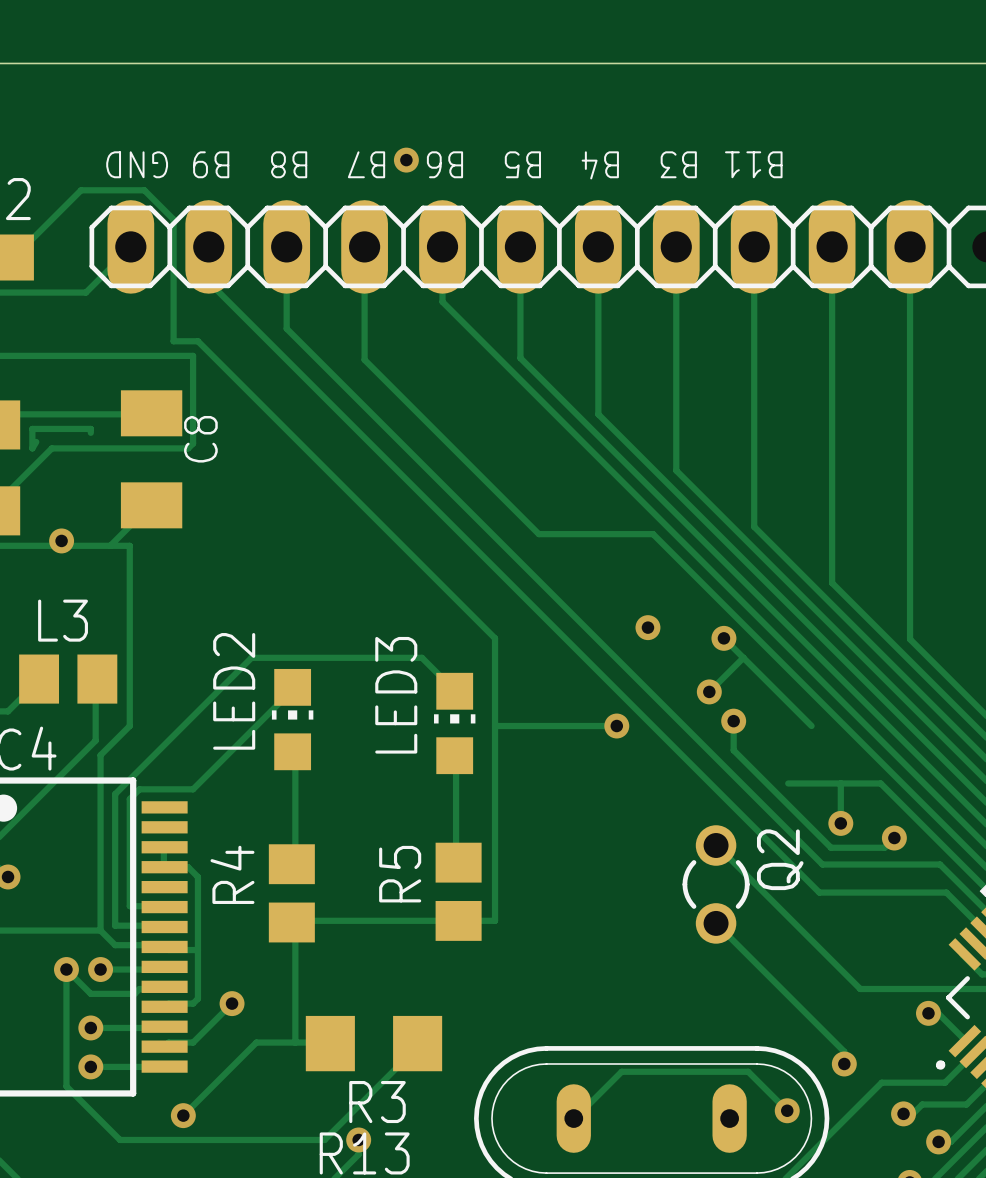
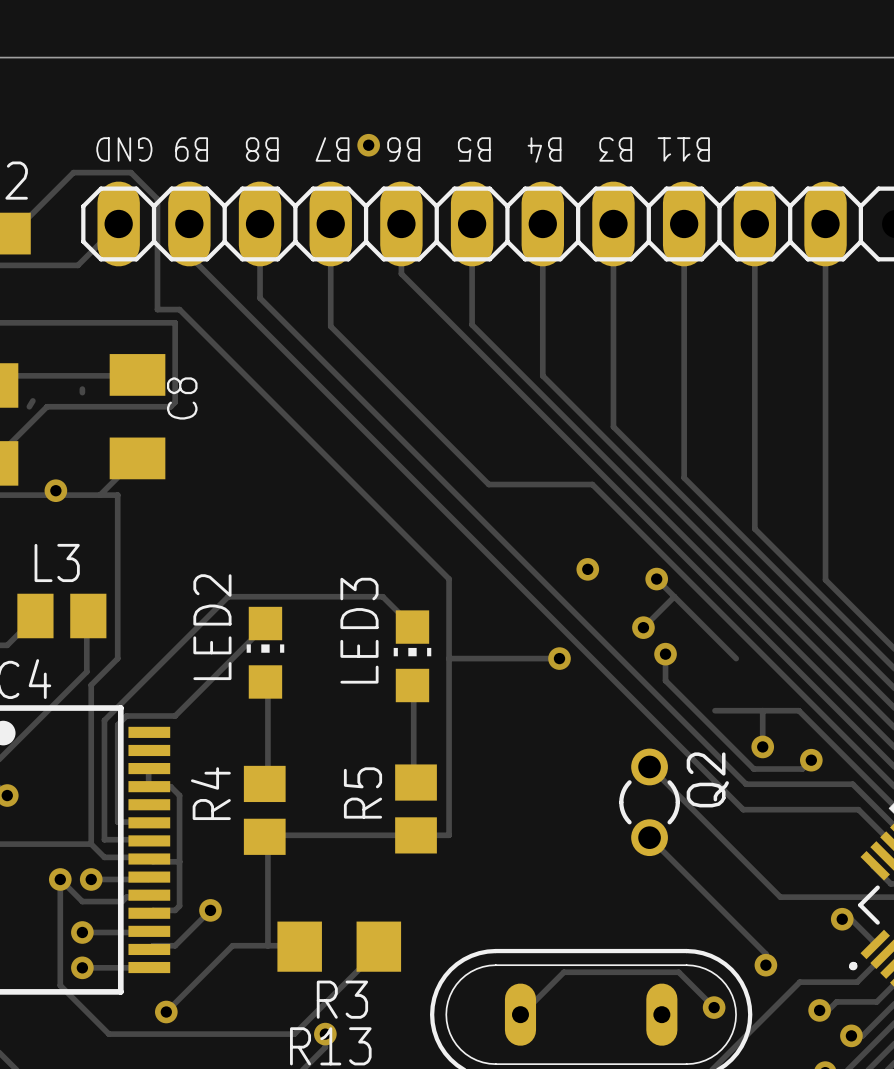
track: (90, 428) (32, 428) (32, 448) -> none

